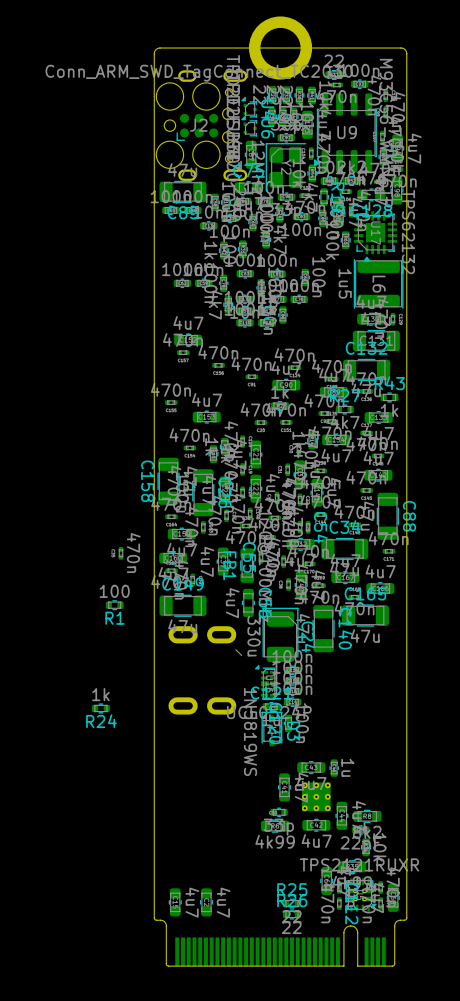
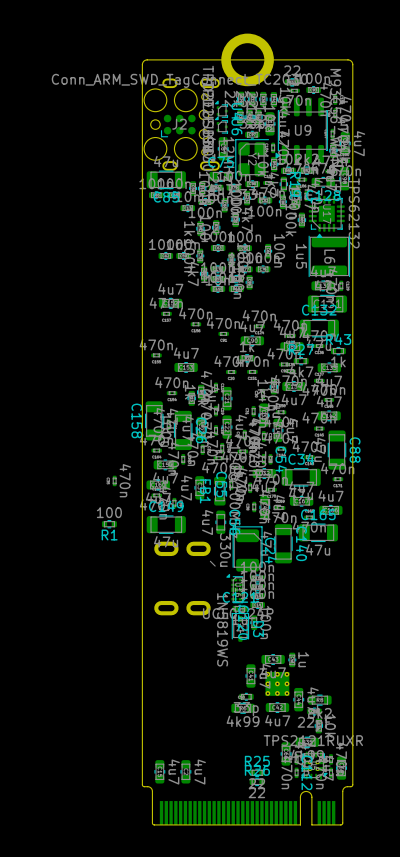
R24: 1k (100, 708) -> none

